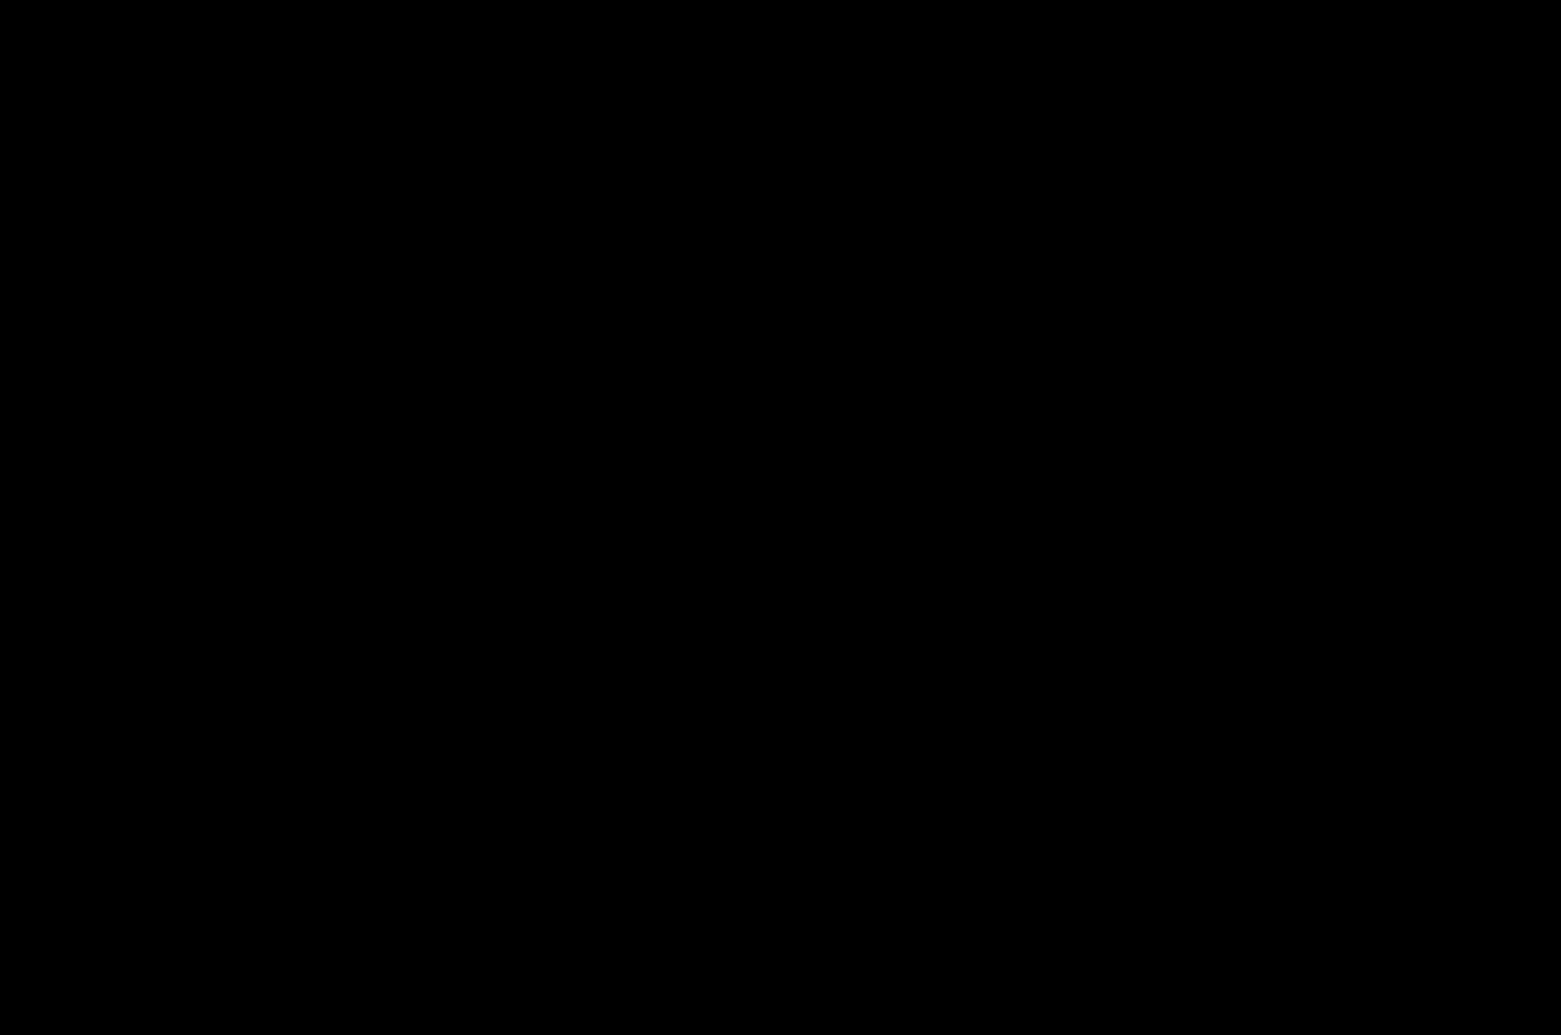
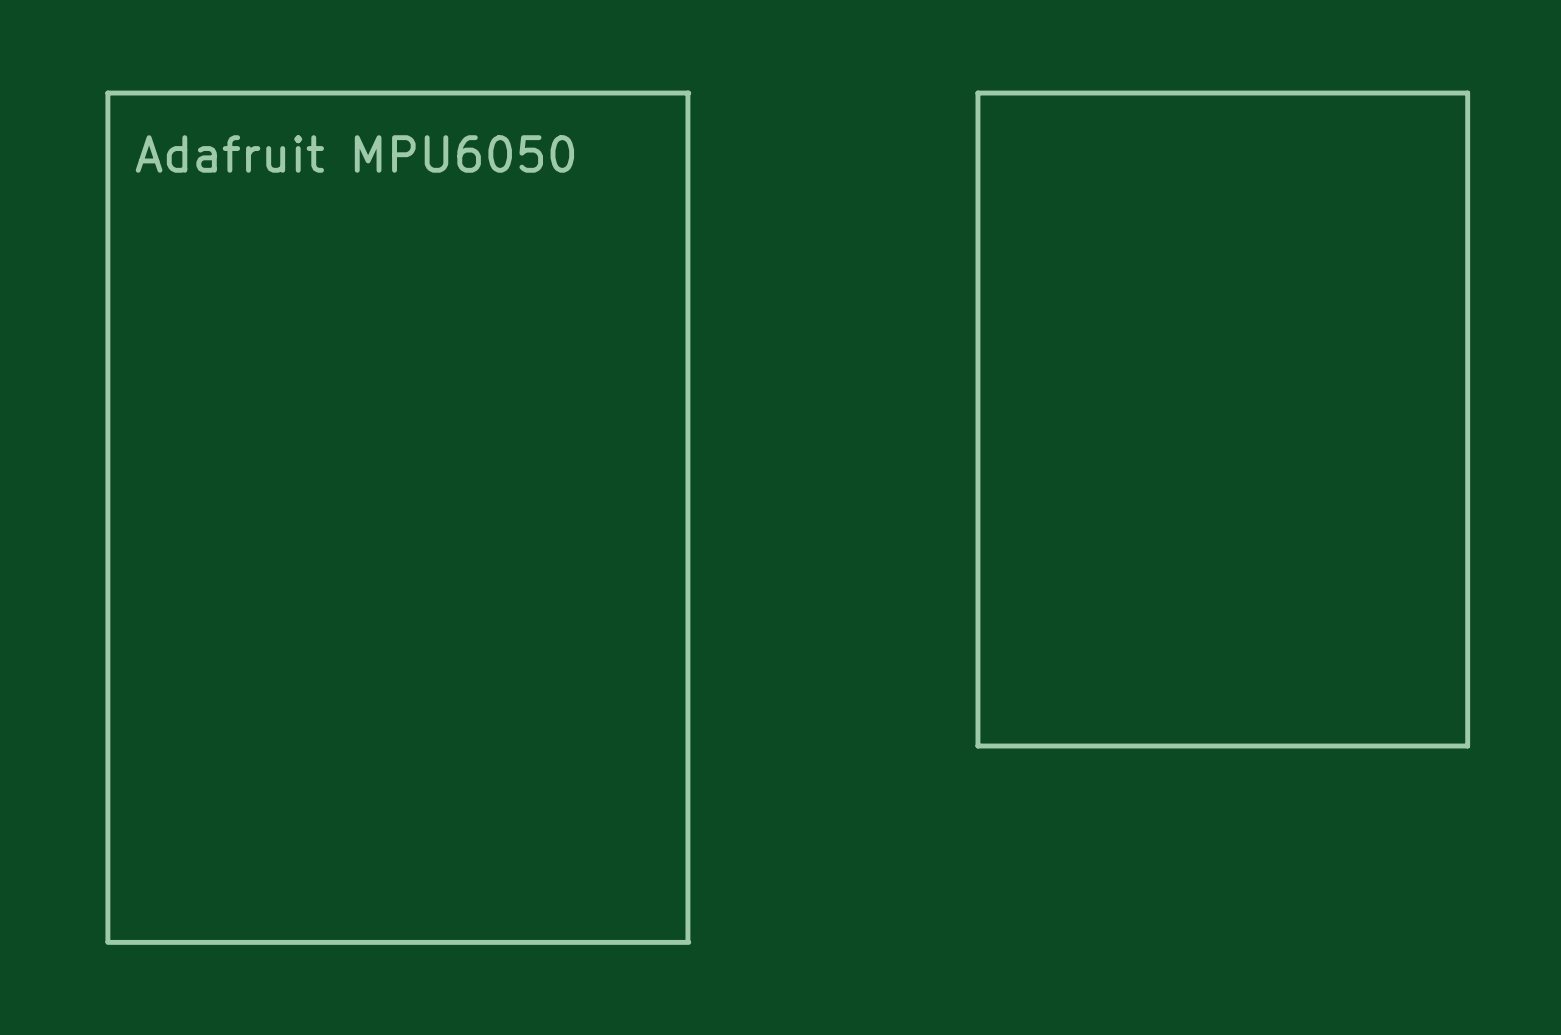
line: none -> (687, 93) (687, 941)
line: none -> (688, 93) (107, 93) (107, 941)
line: none -> (977, 93) (977, 746) (1467, 746) (1467, 93) (977, 93)
text: none -> Adafruit MPU6050 (354, 153)
line: none -> (107, 942) (688, 942)

